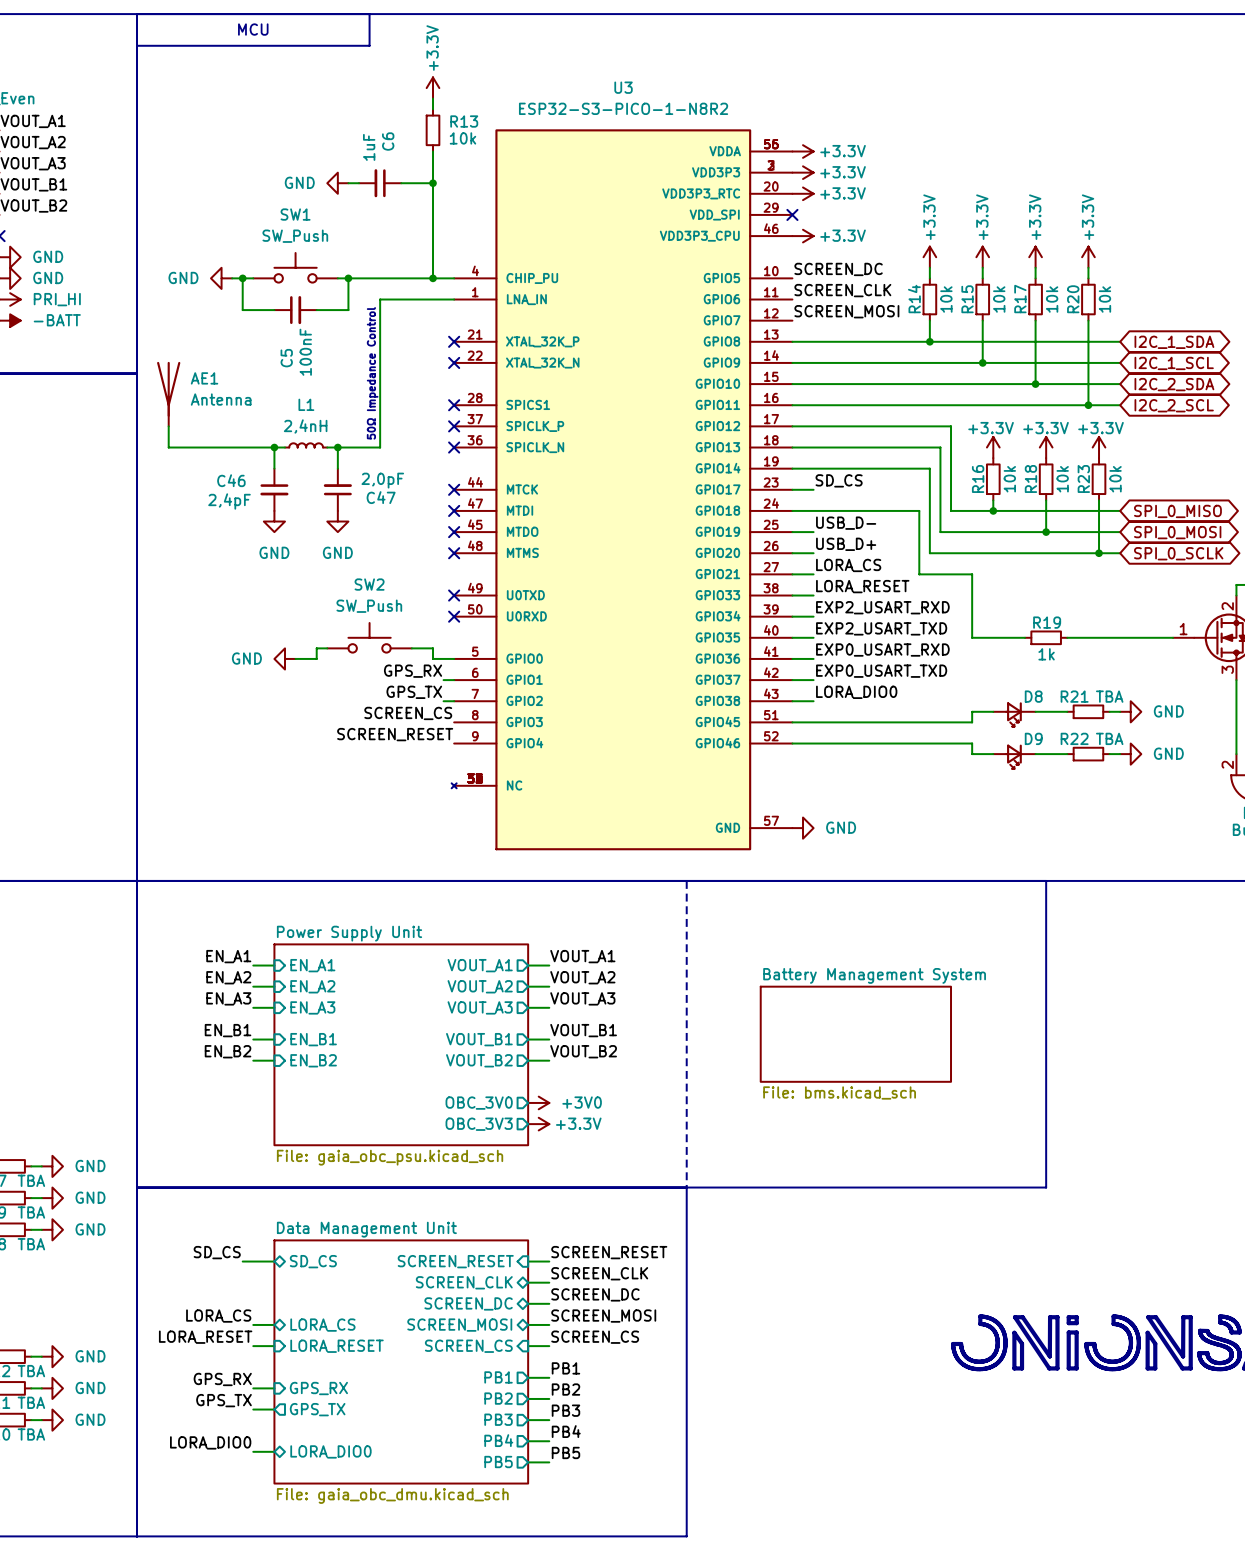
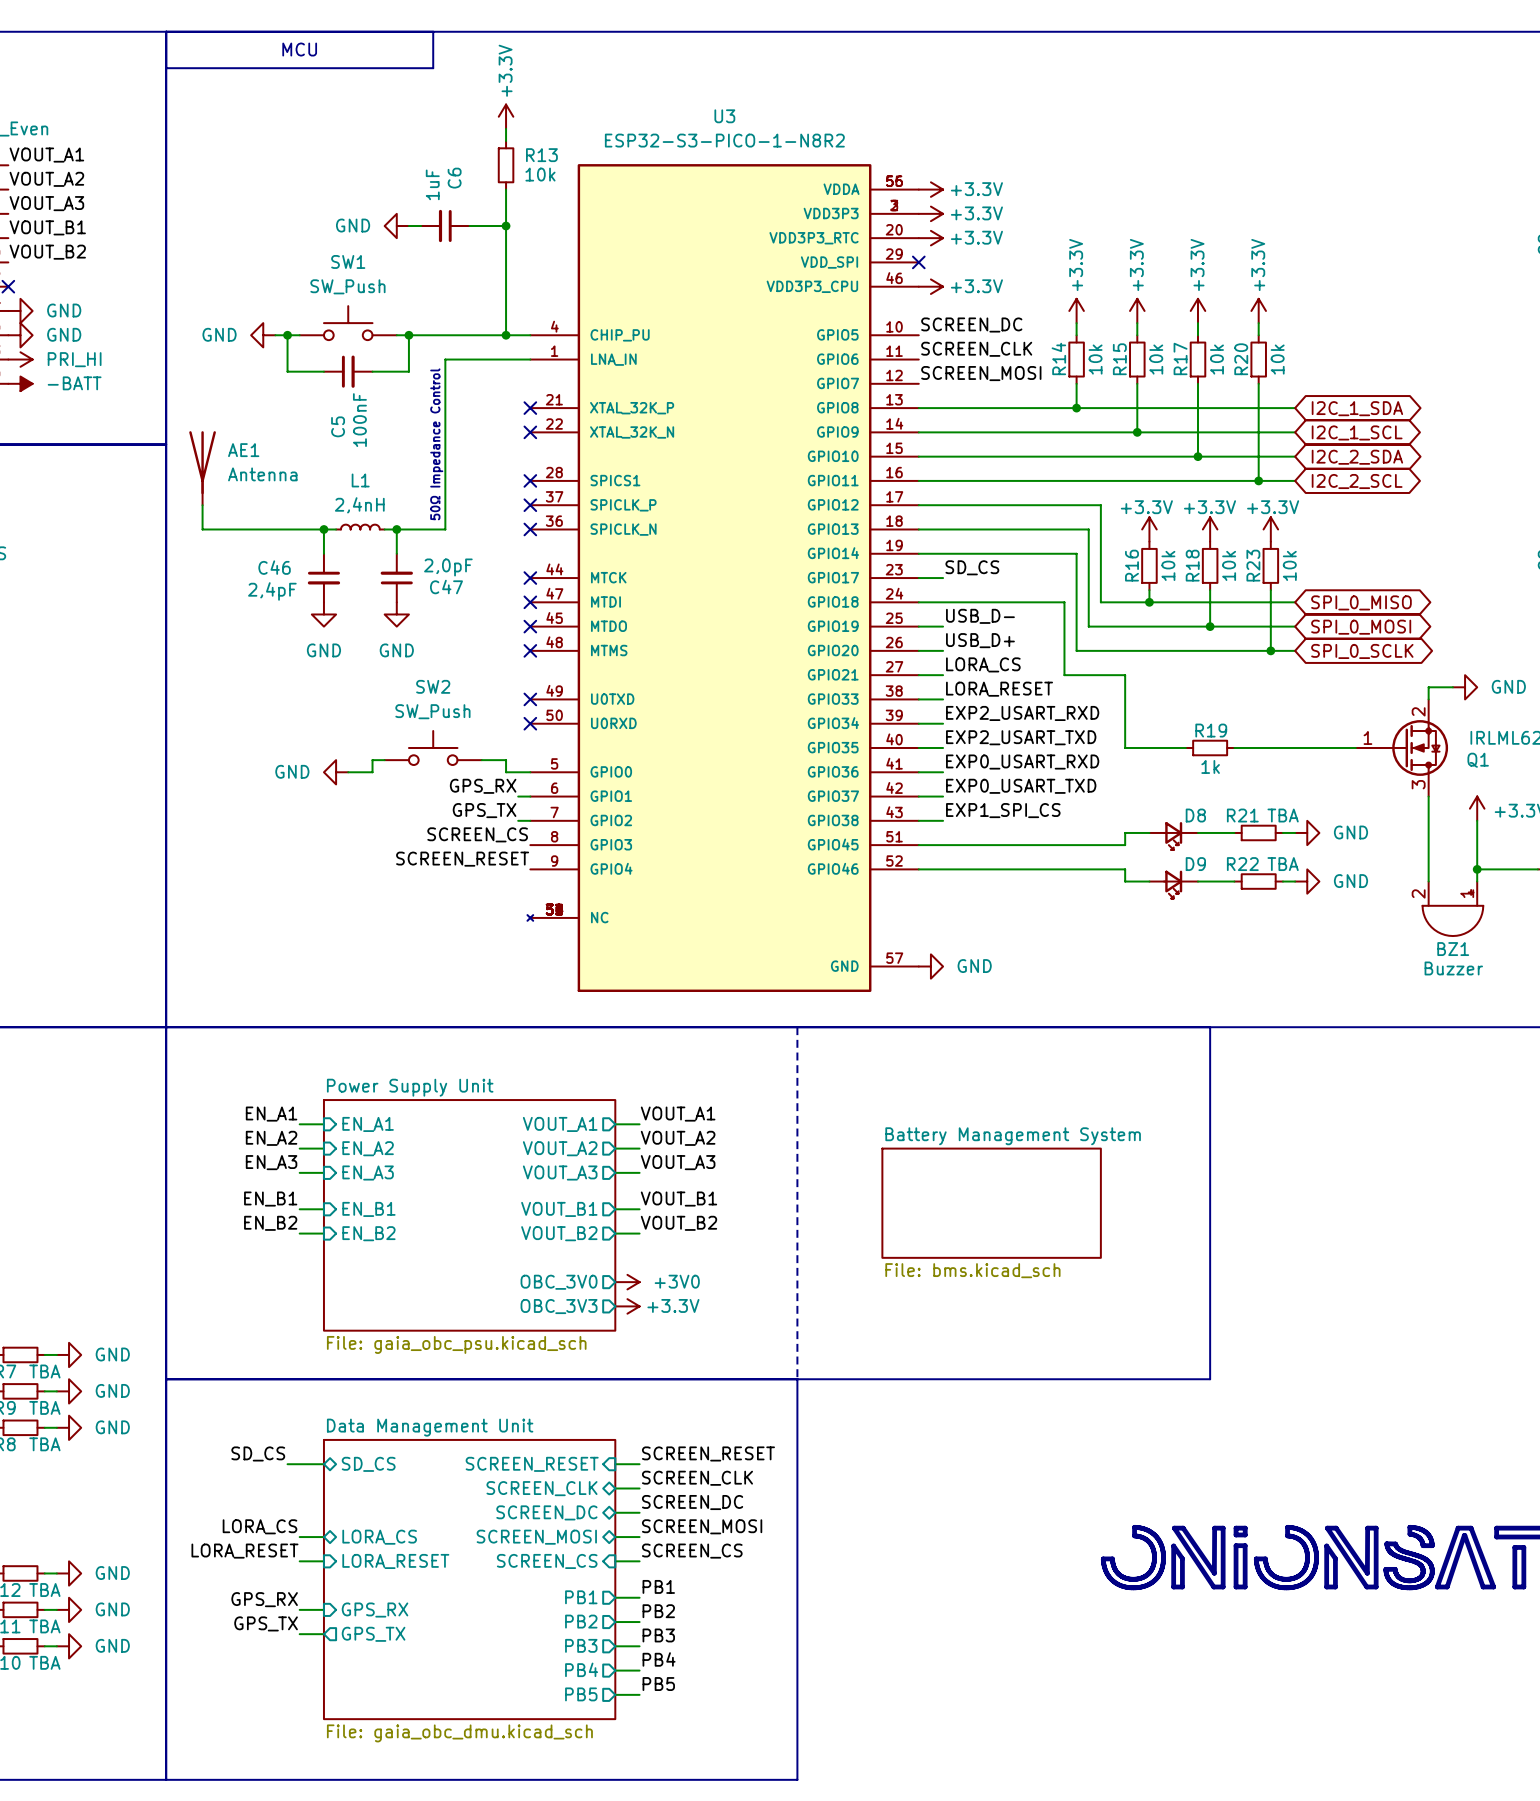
label: LORA_DIO0 (856, 692) -> EXP1_SPI_CS (1003, 810)
label: LORA_DIO0 (210, 1442) -> none
wire: (253, 1451) (274, 1451) -> none
sheet pin: LORA_DIO0 (330, 1451) -> none

